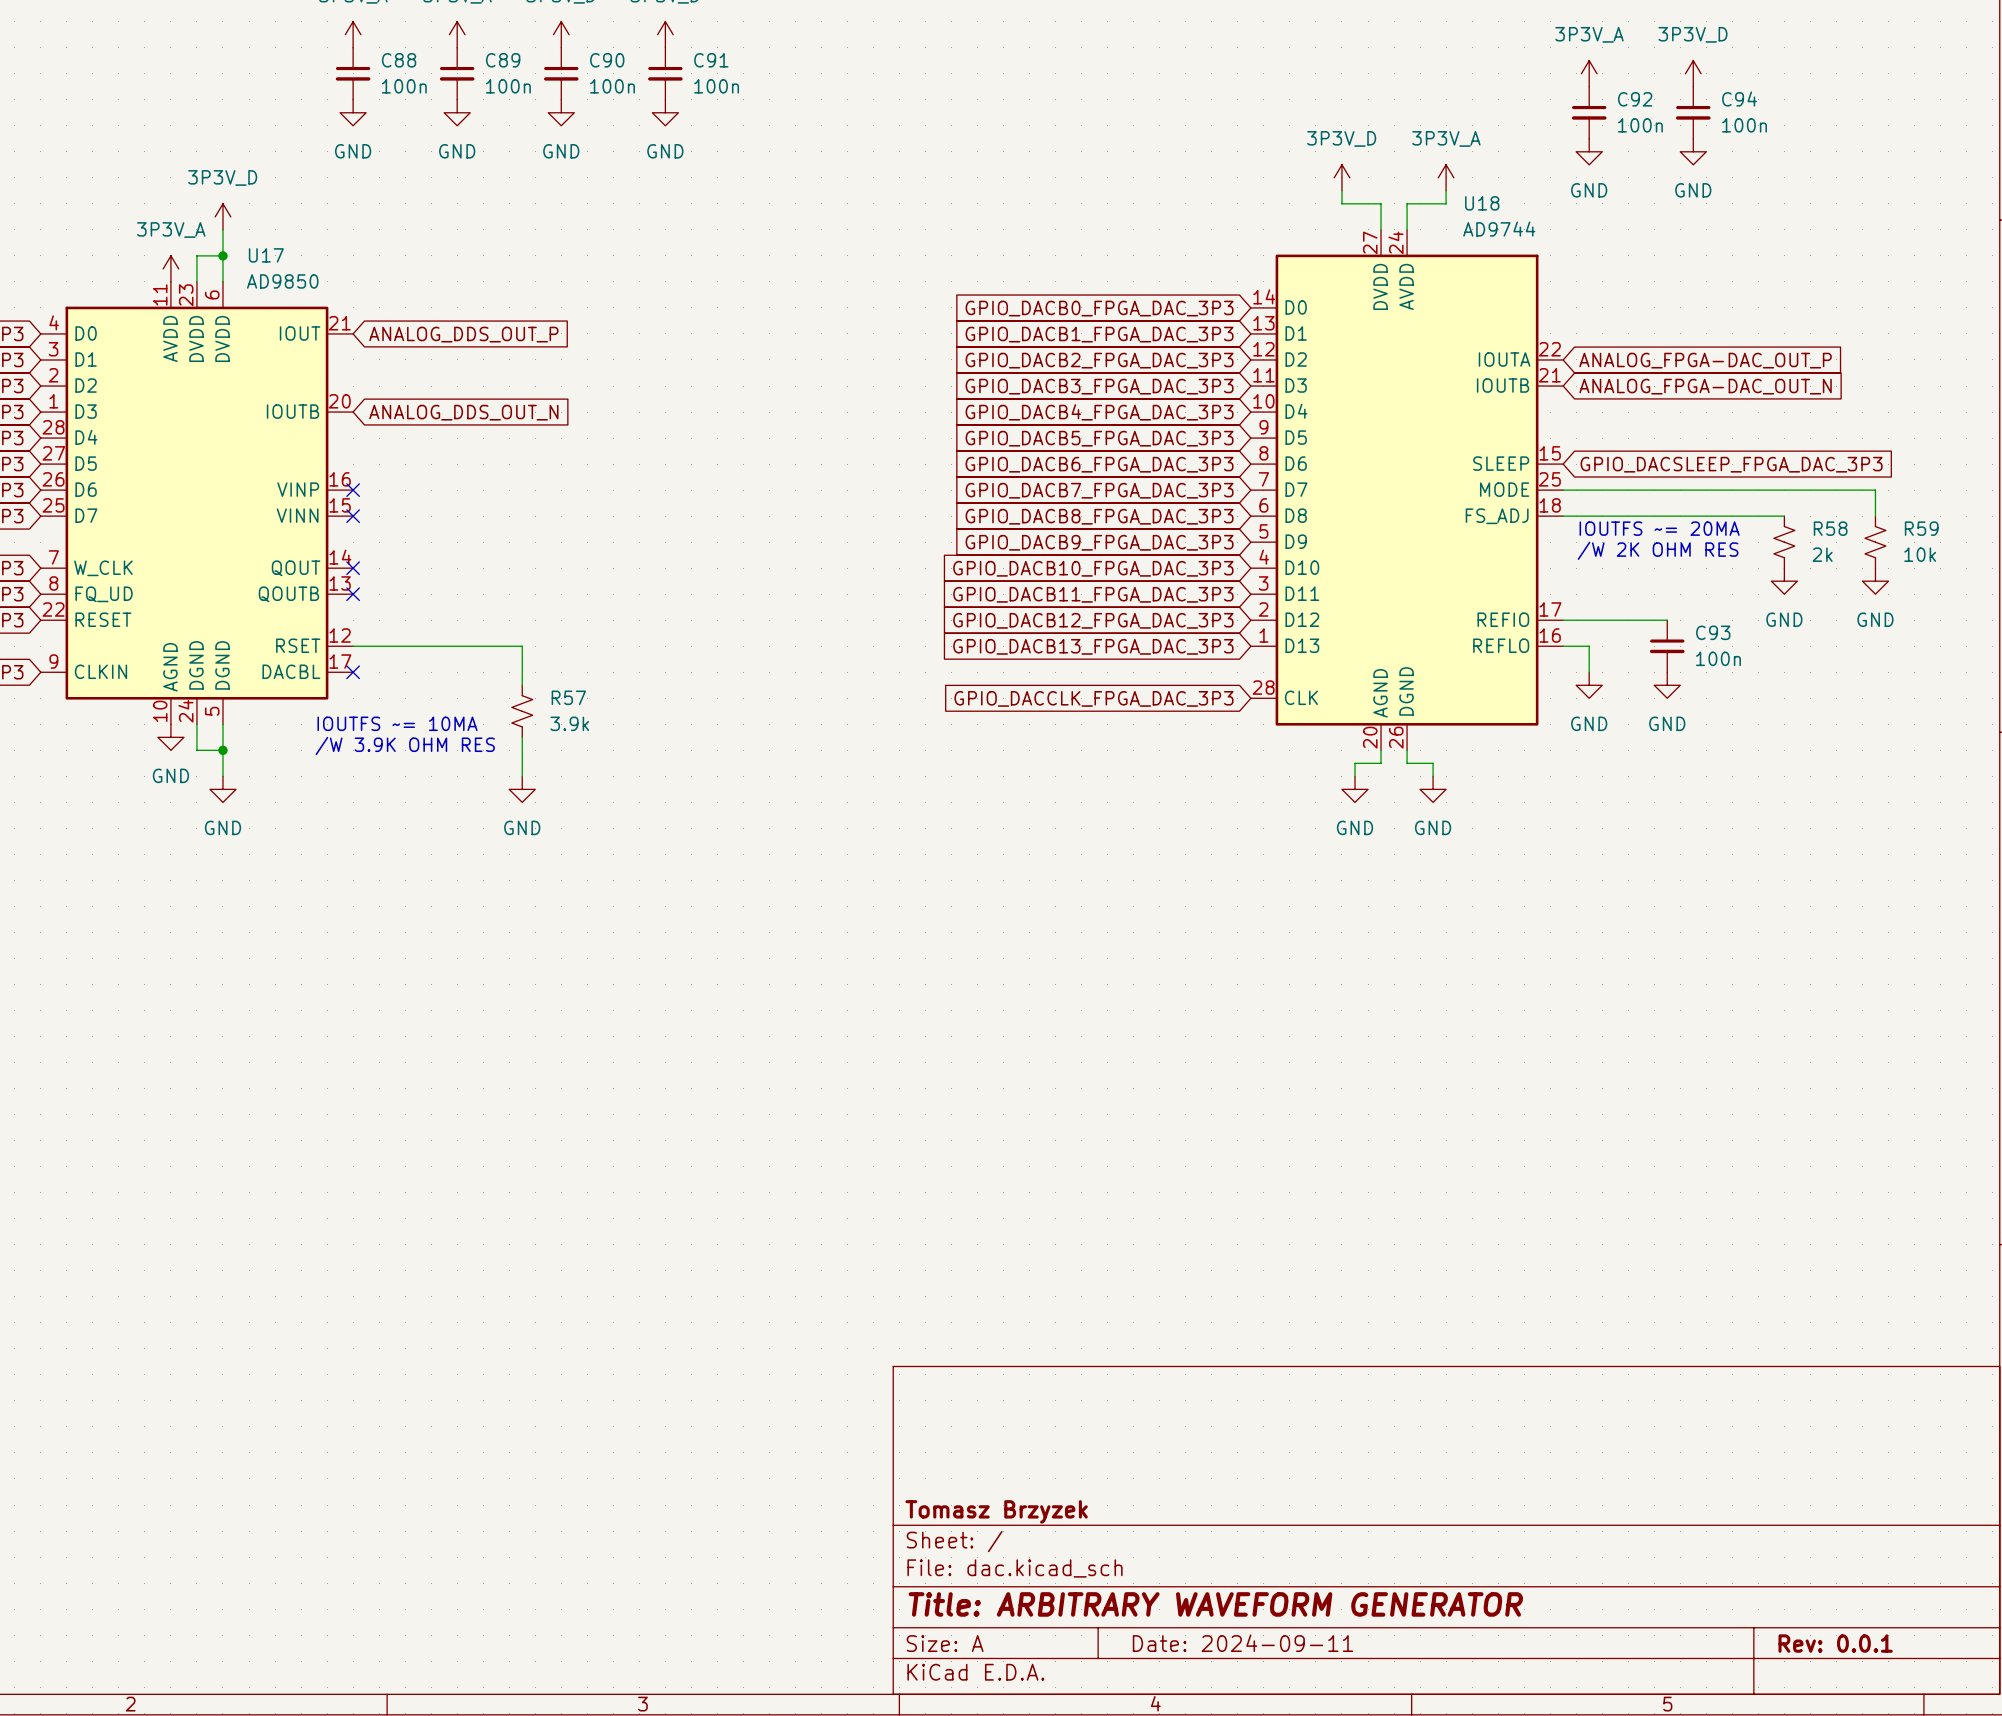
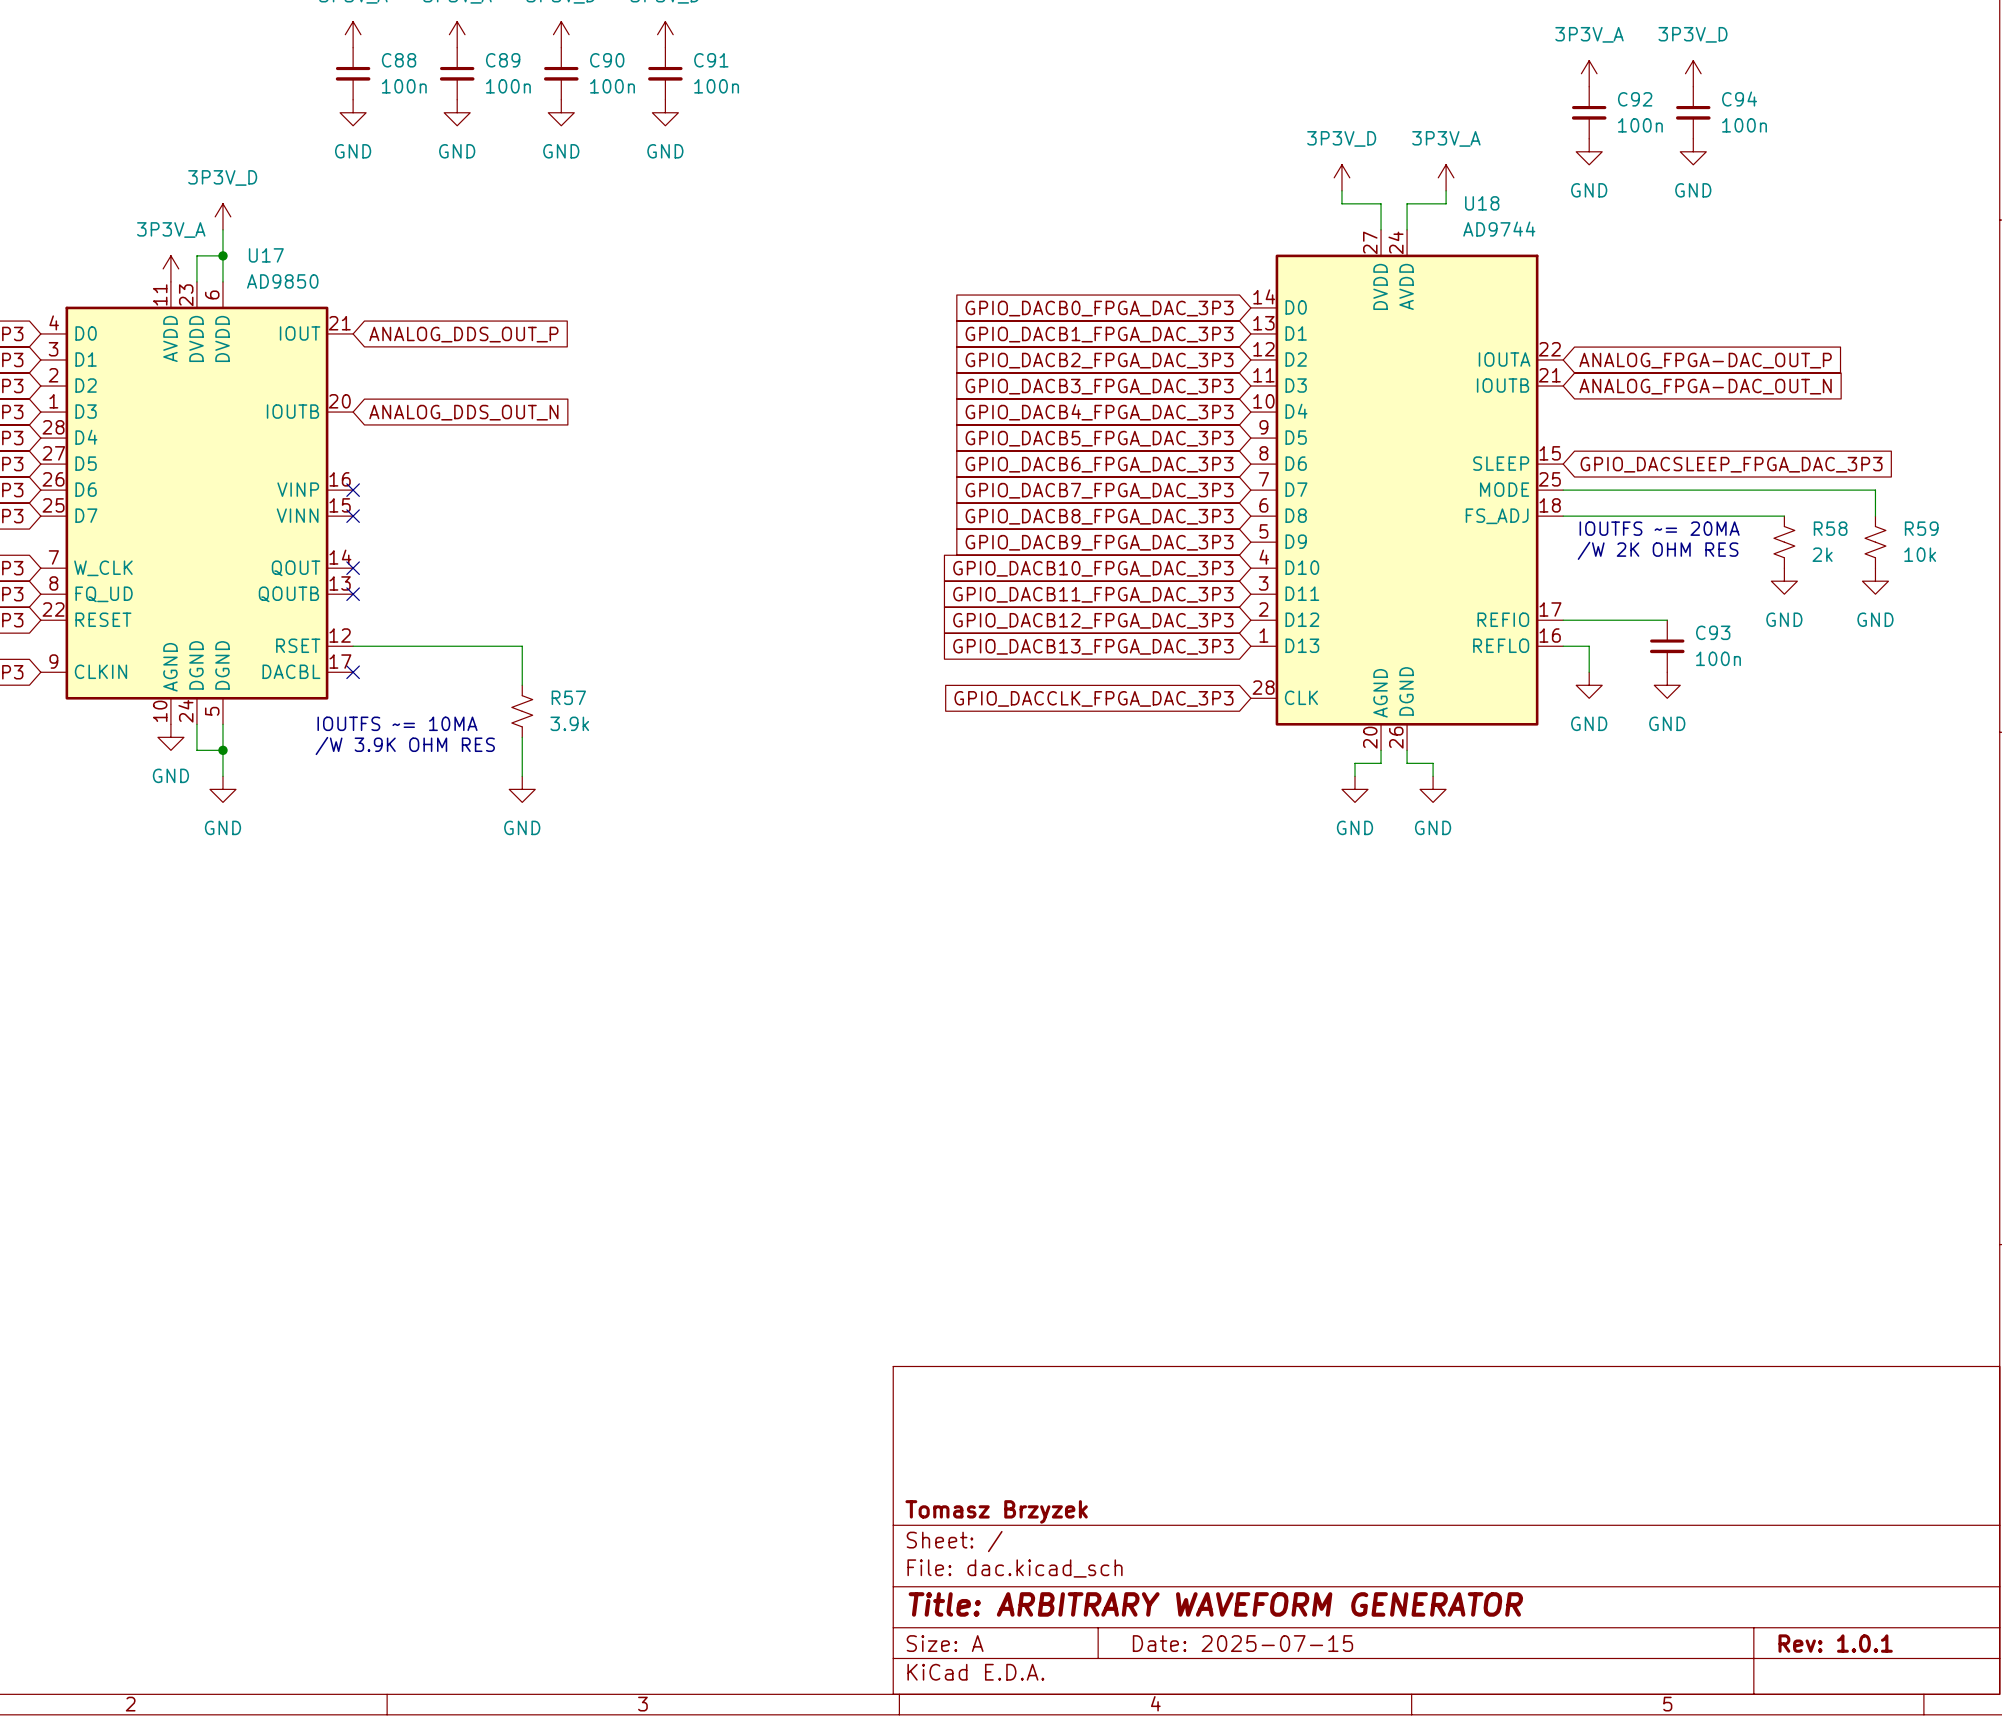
title block: Date: 2024-09-11 (1242, 1643) -> Date: 2025-07-15 (1242, 1643)
title block: Rev: 0.0.1 (1835, 1643) -> Rev: 1.0.1 (1835, 1643)

